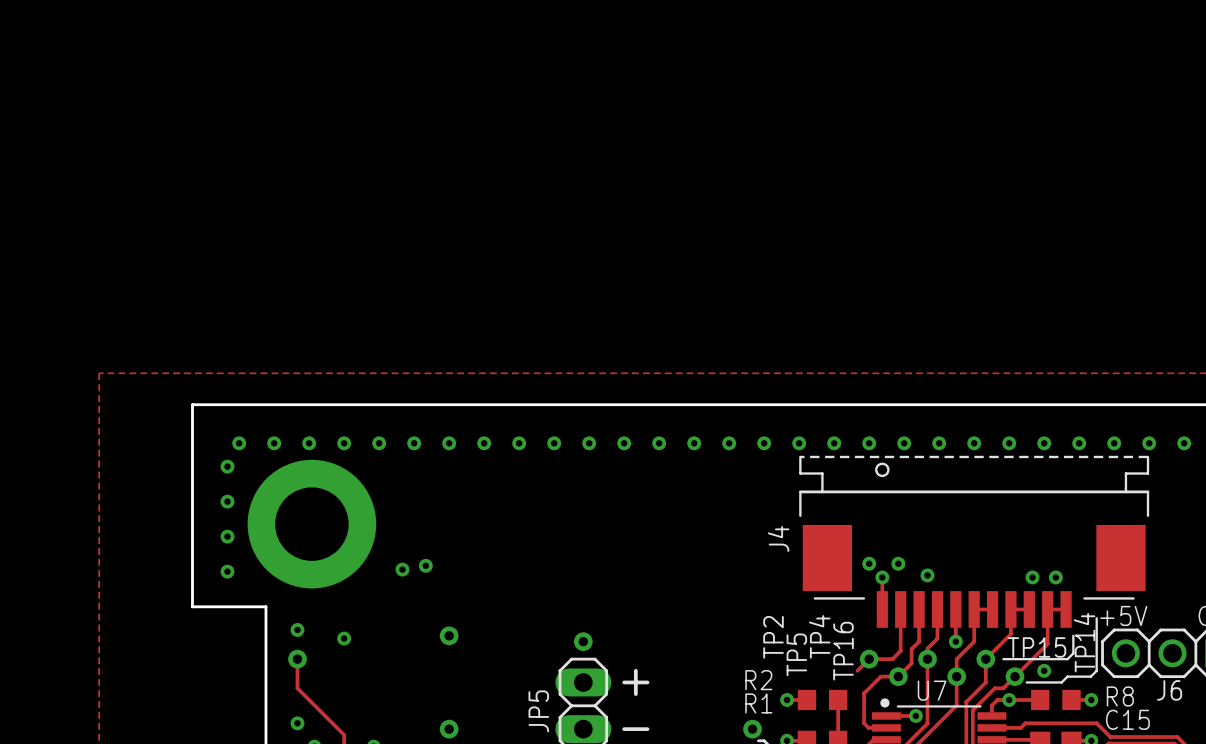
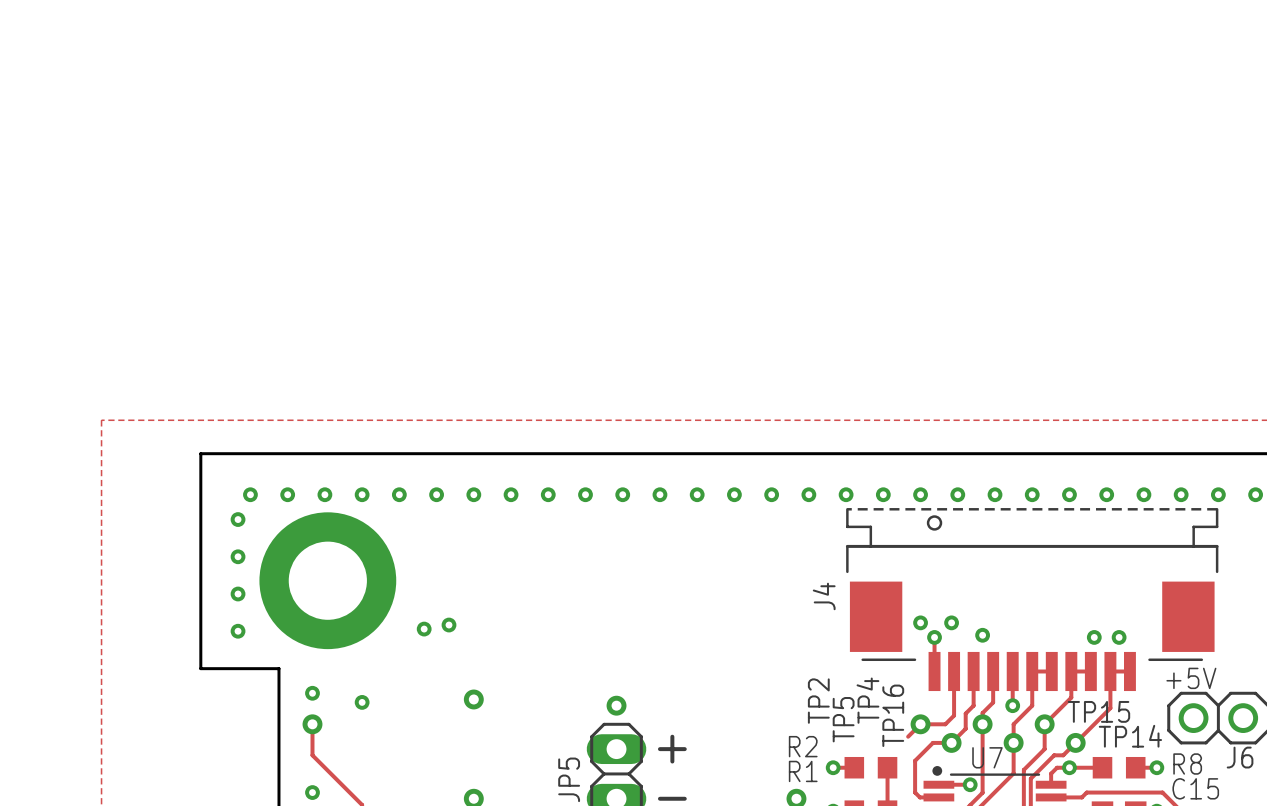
line: (1096, 618) (1096, 670) (1090, 676) (1067, 676) (1061, 682) (1026, 682) -> none
line: (1073, 635) (1073, 653) (1067, 659) (1003, 659) -> none
TP14 name rotation: 0° (1084, 642) -> 90° clockwise (1130, 736)
via: (1044, 670) -> none

